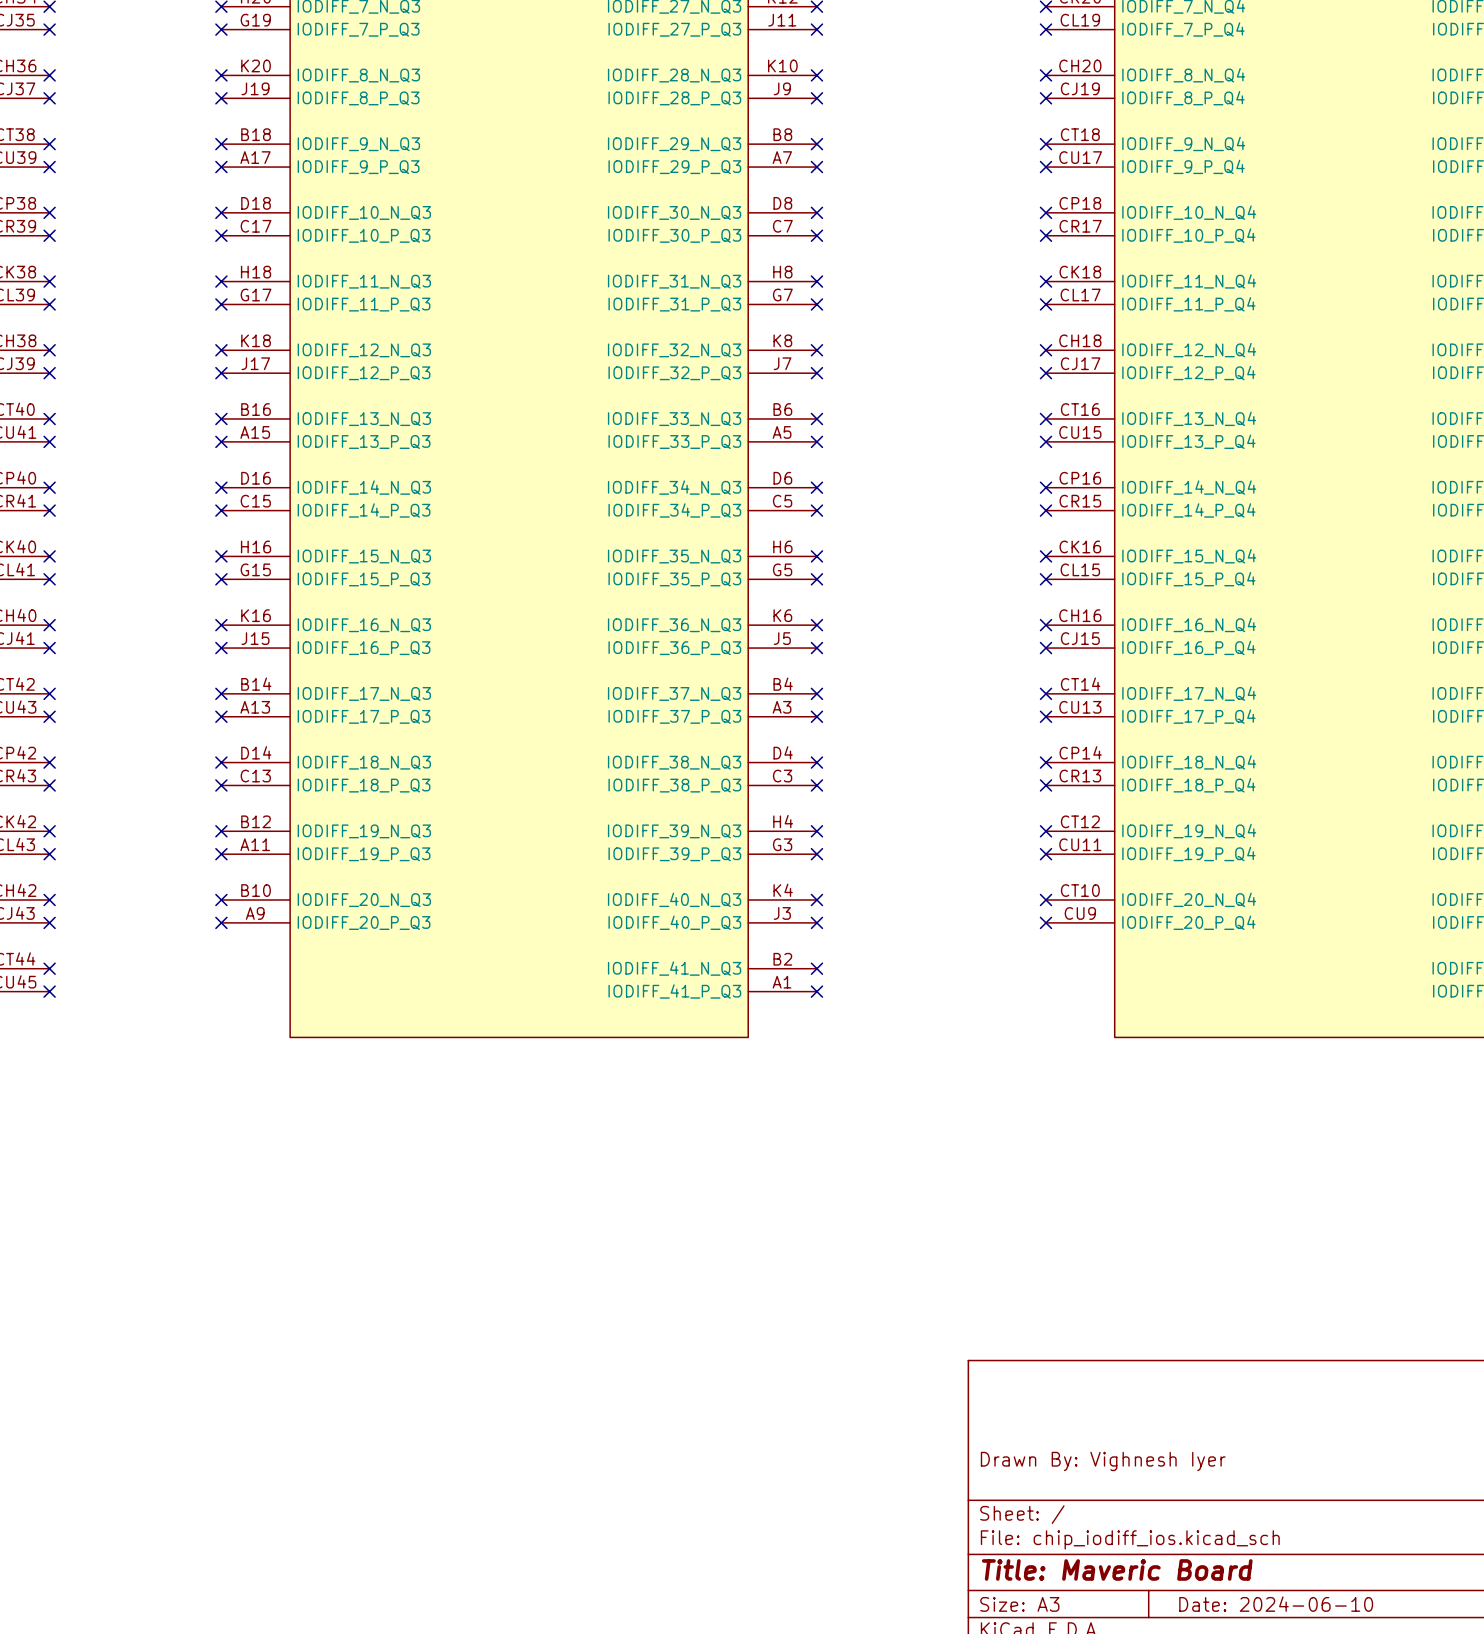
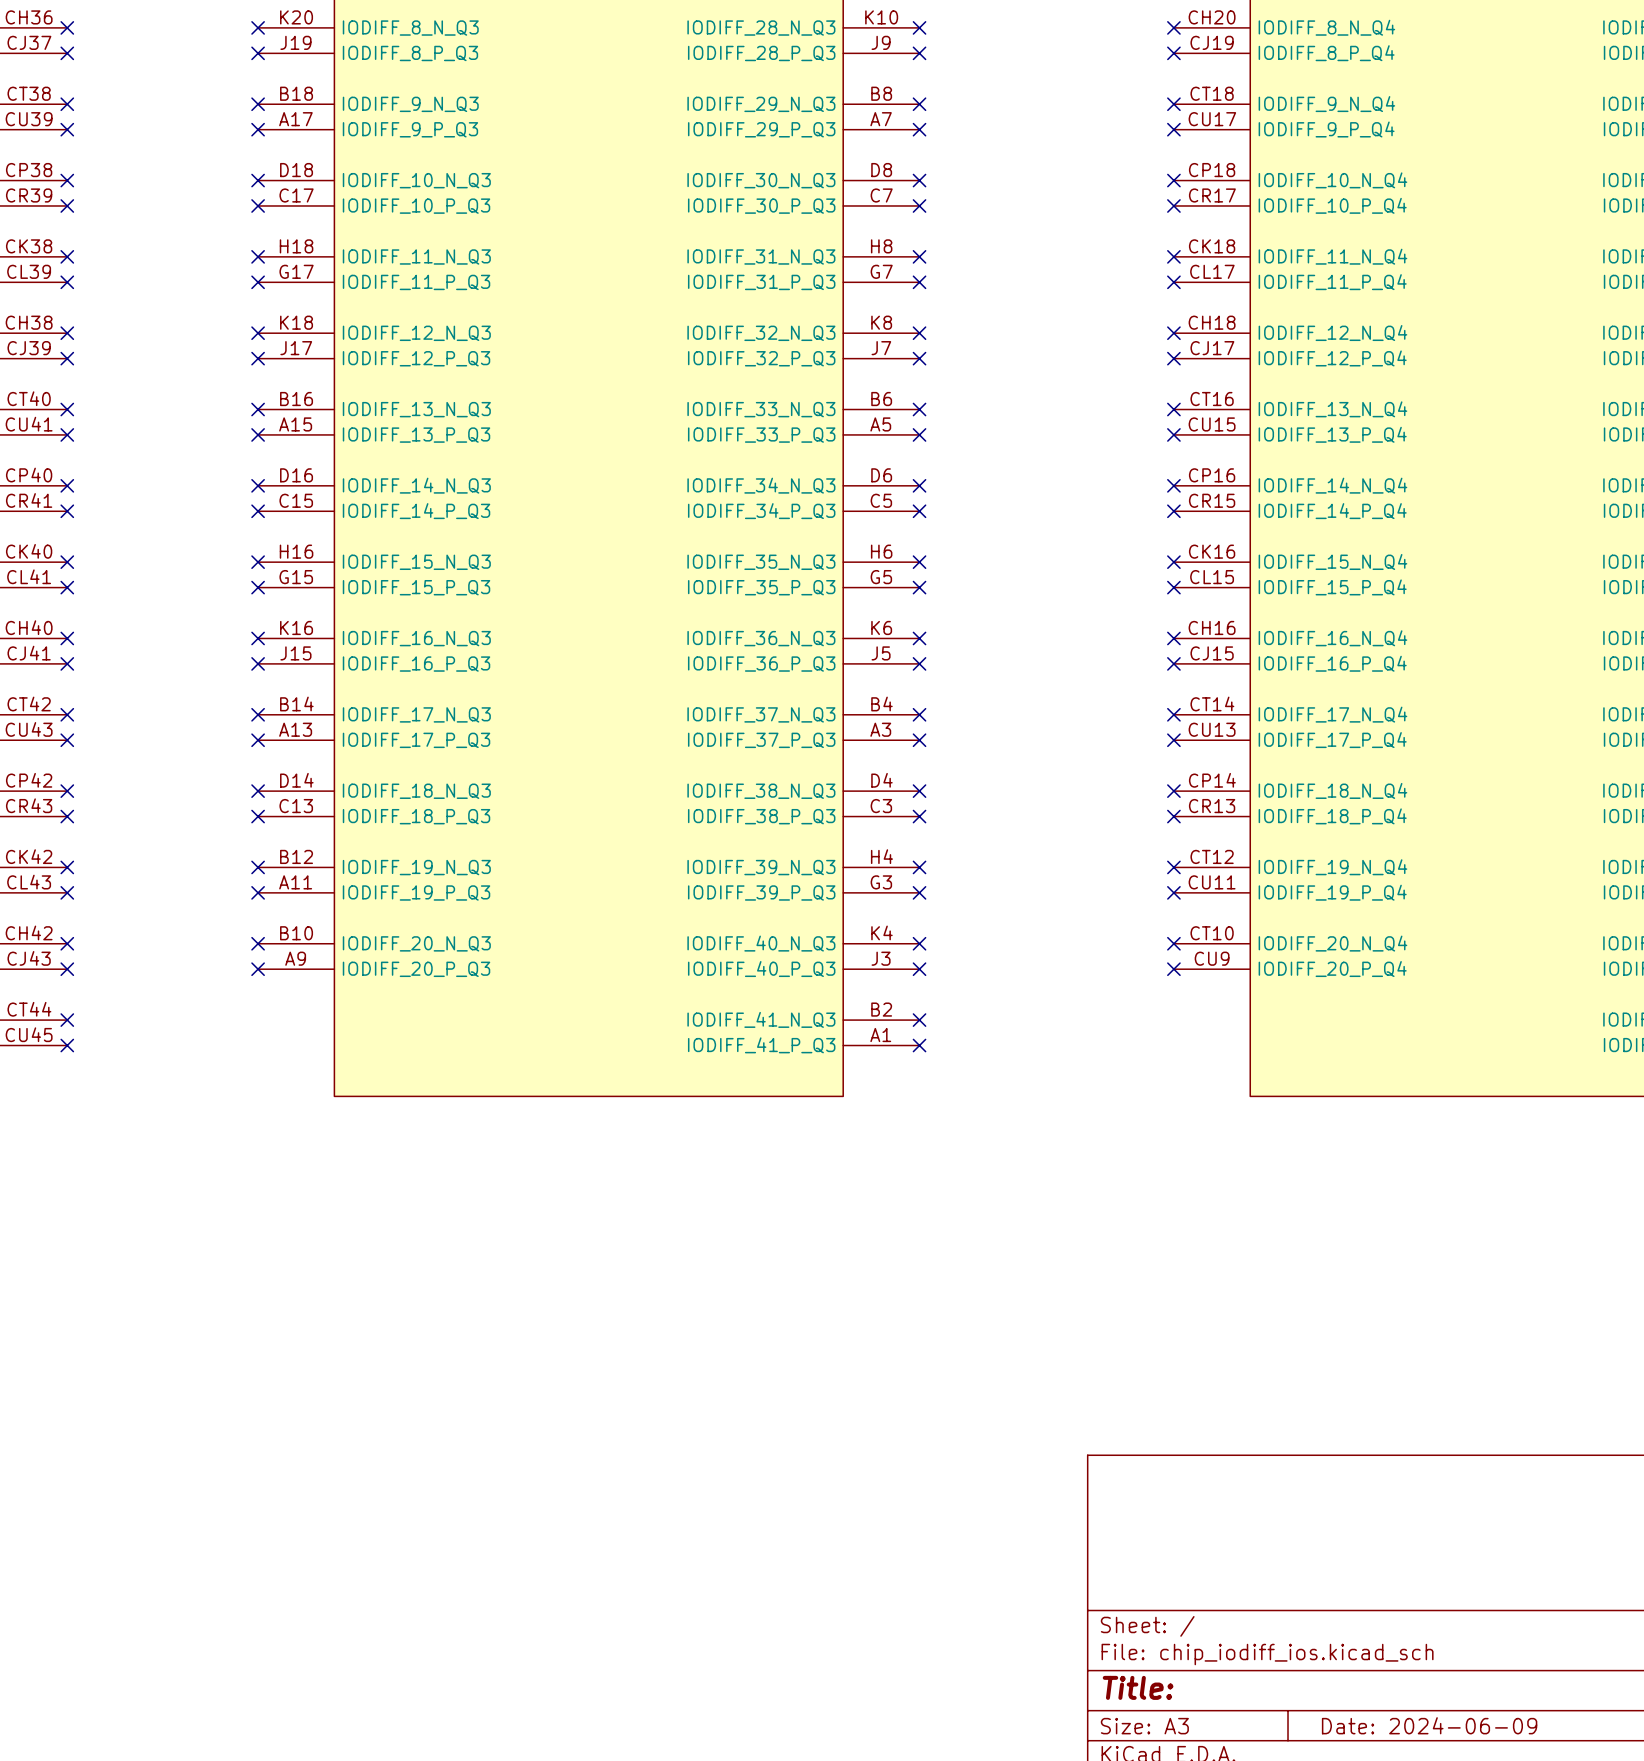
title block: Drawn By: Vighnesh Iyer (1103, 1461) -> none
title block: Title: Maveric Board (1117, 1569) -> Title: (1138, 1687)
title block: Date: 2024-06-10 (1276, 1604) -> Date: 2024-06-09 (1429, 1725)

